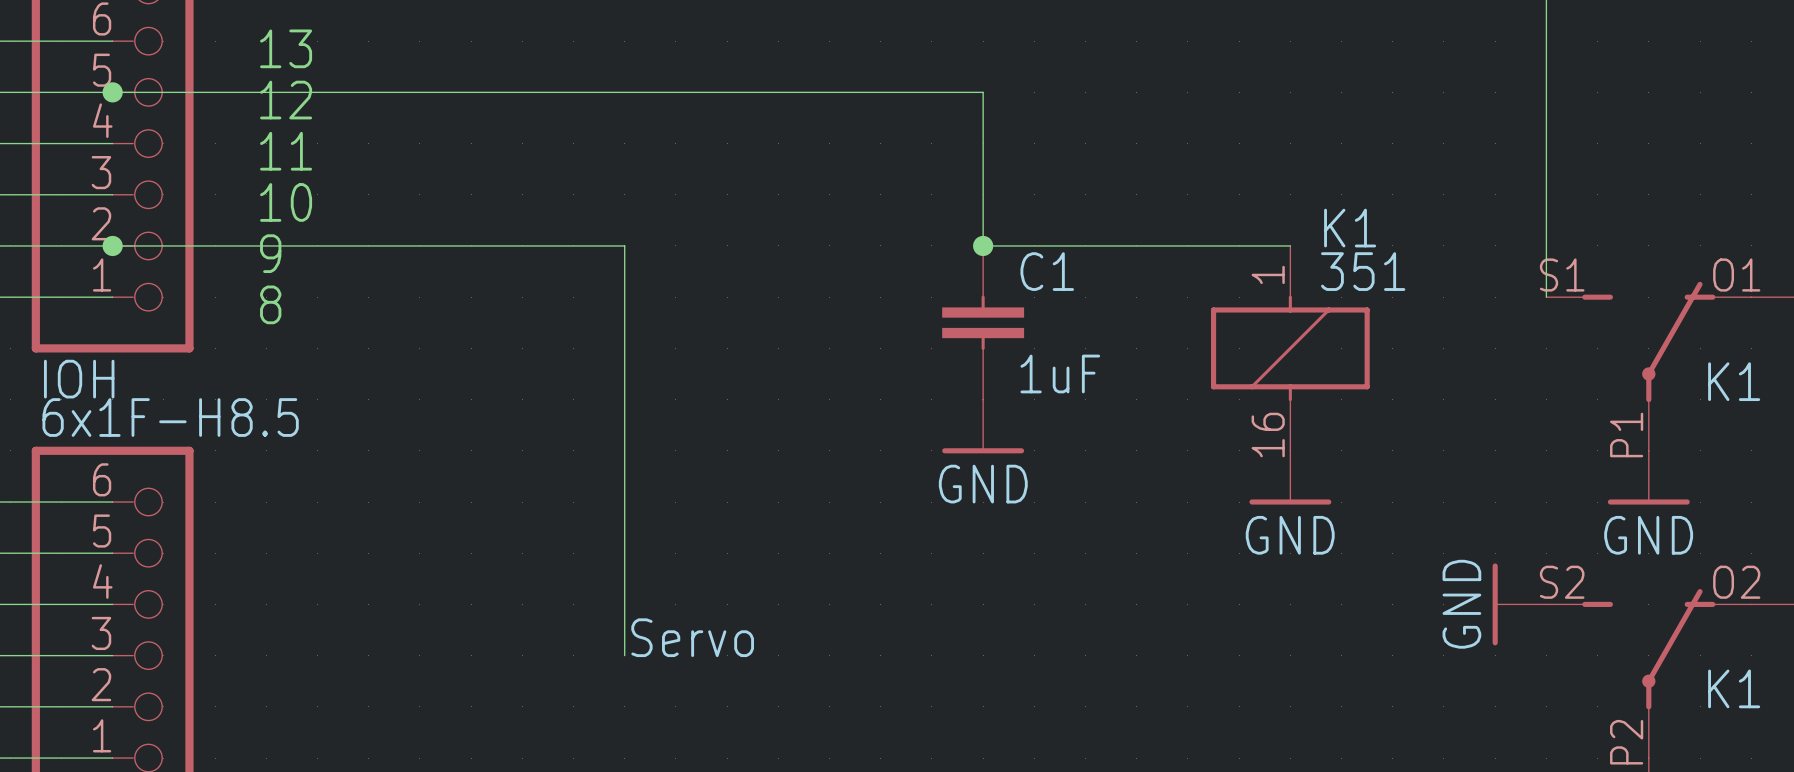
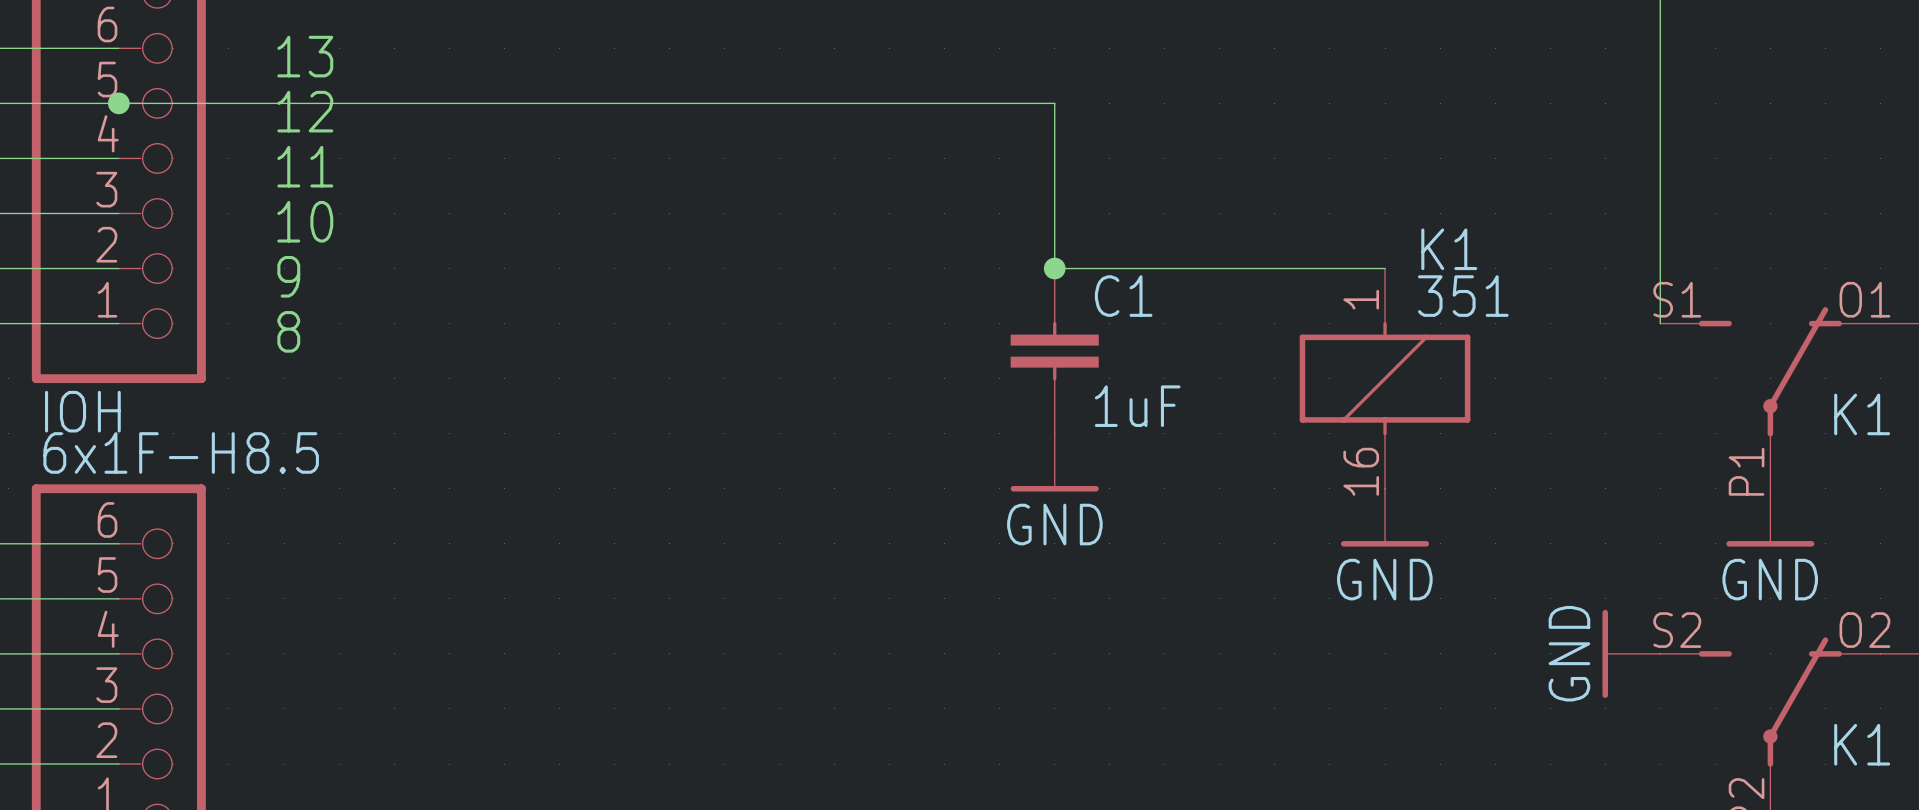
wire: (112, 245) (624, 245) (624, 655) -> none
junction: (112, 245) -> none
text: Servo (692, 637) -> none

